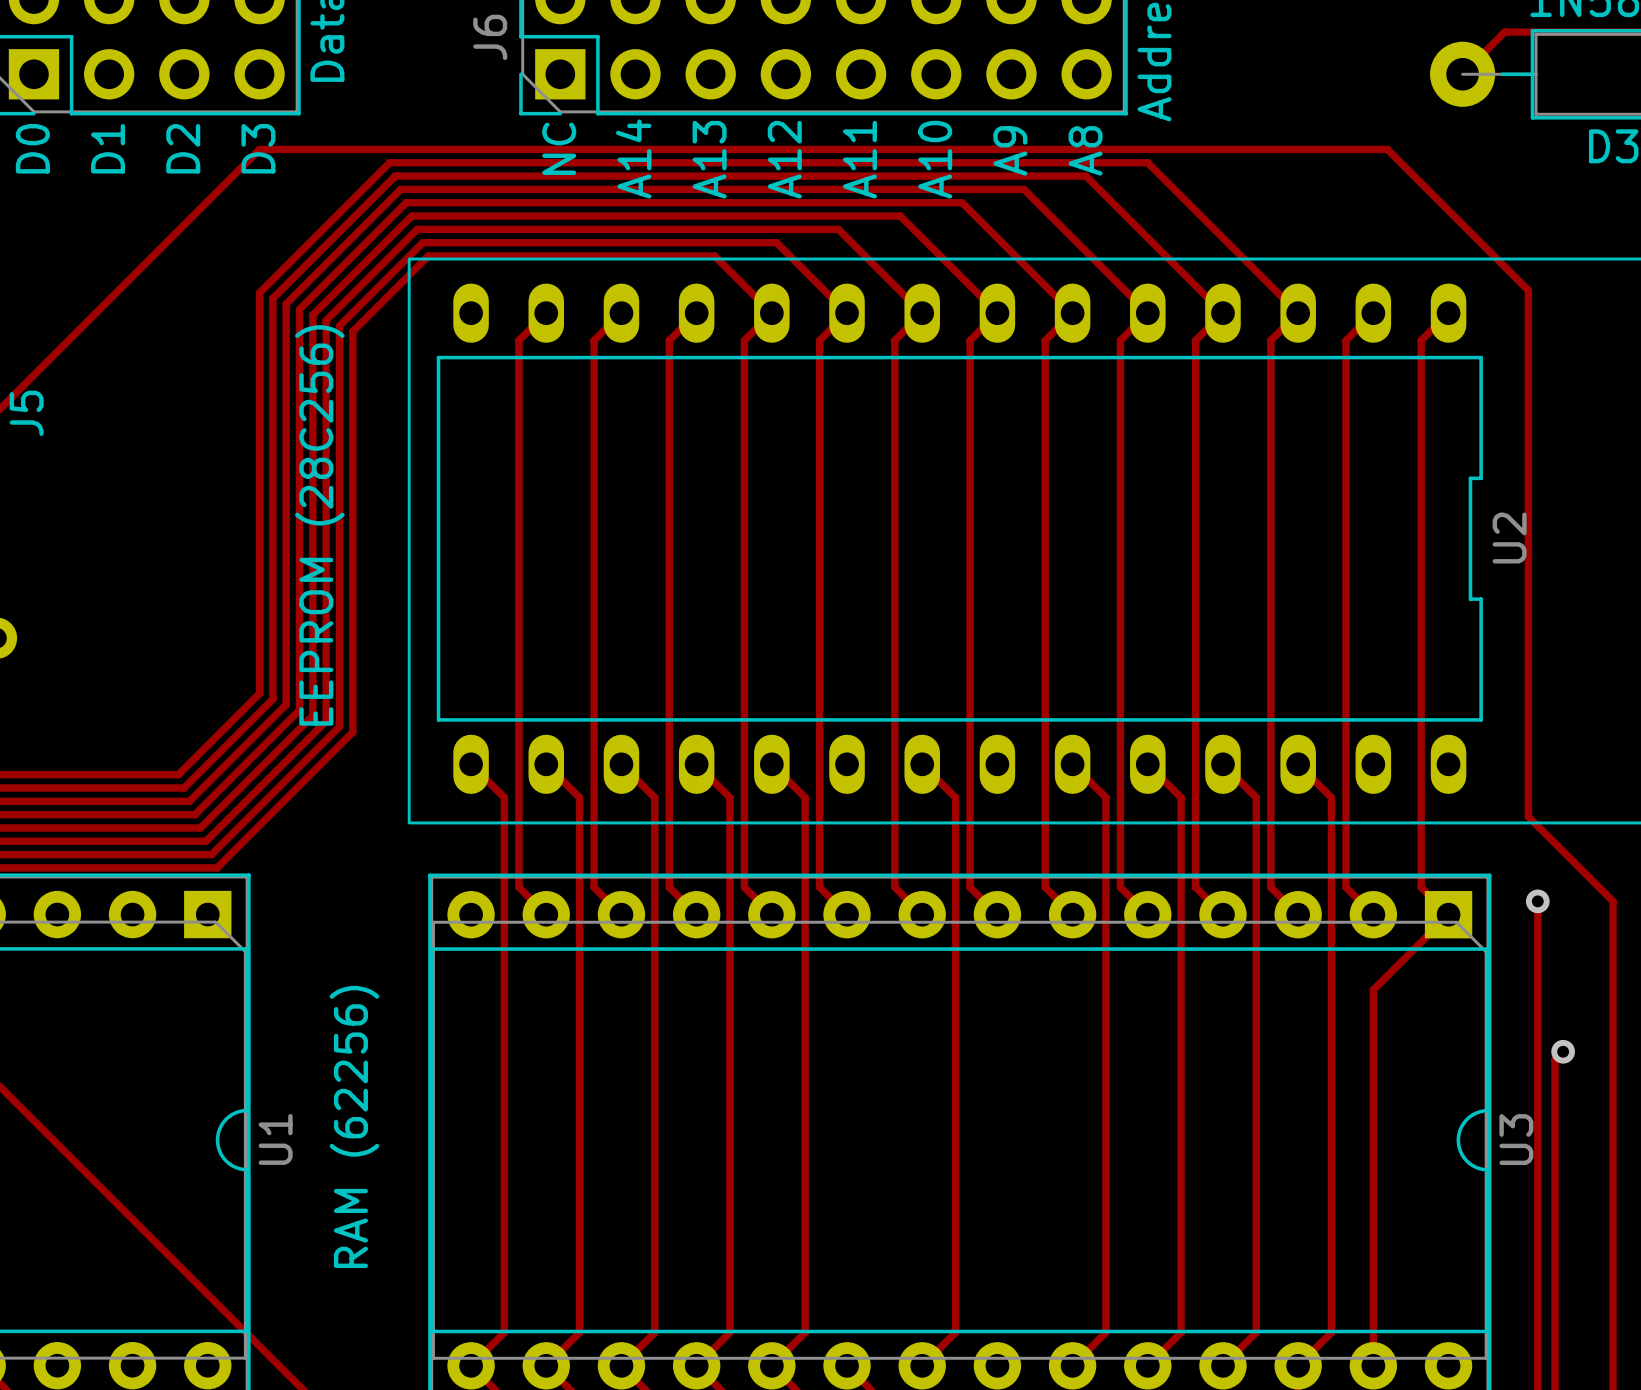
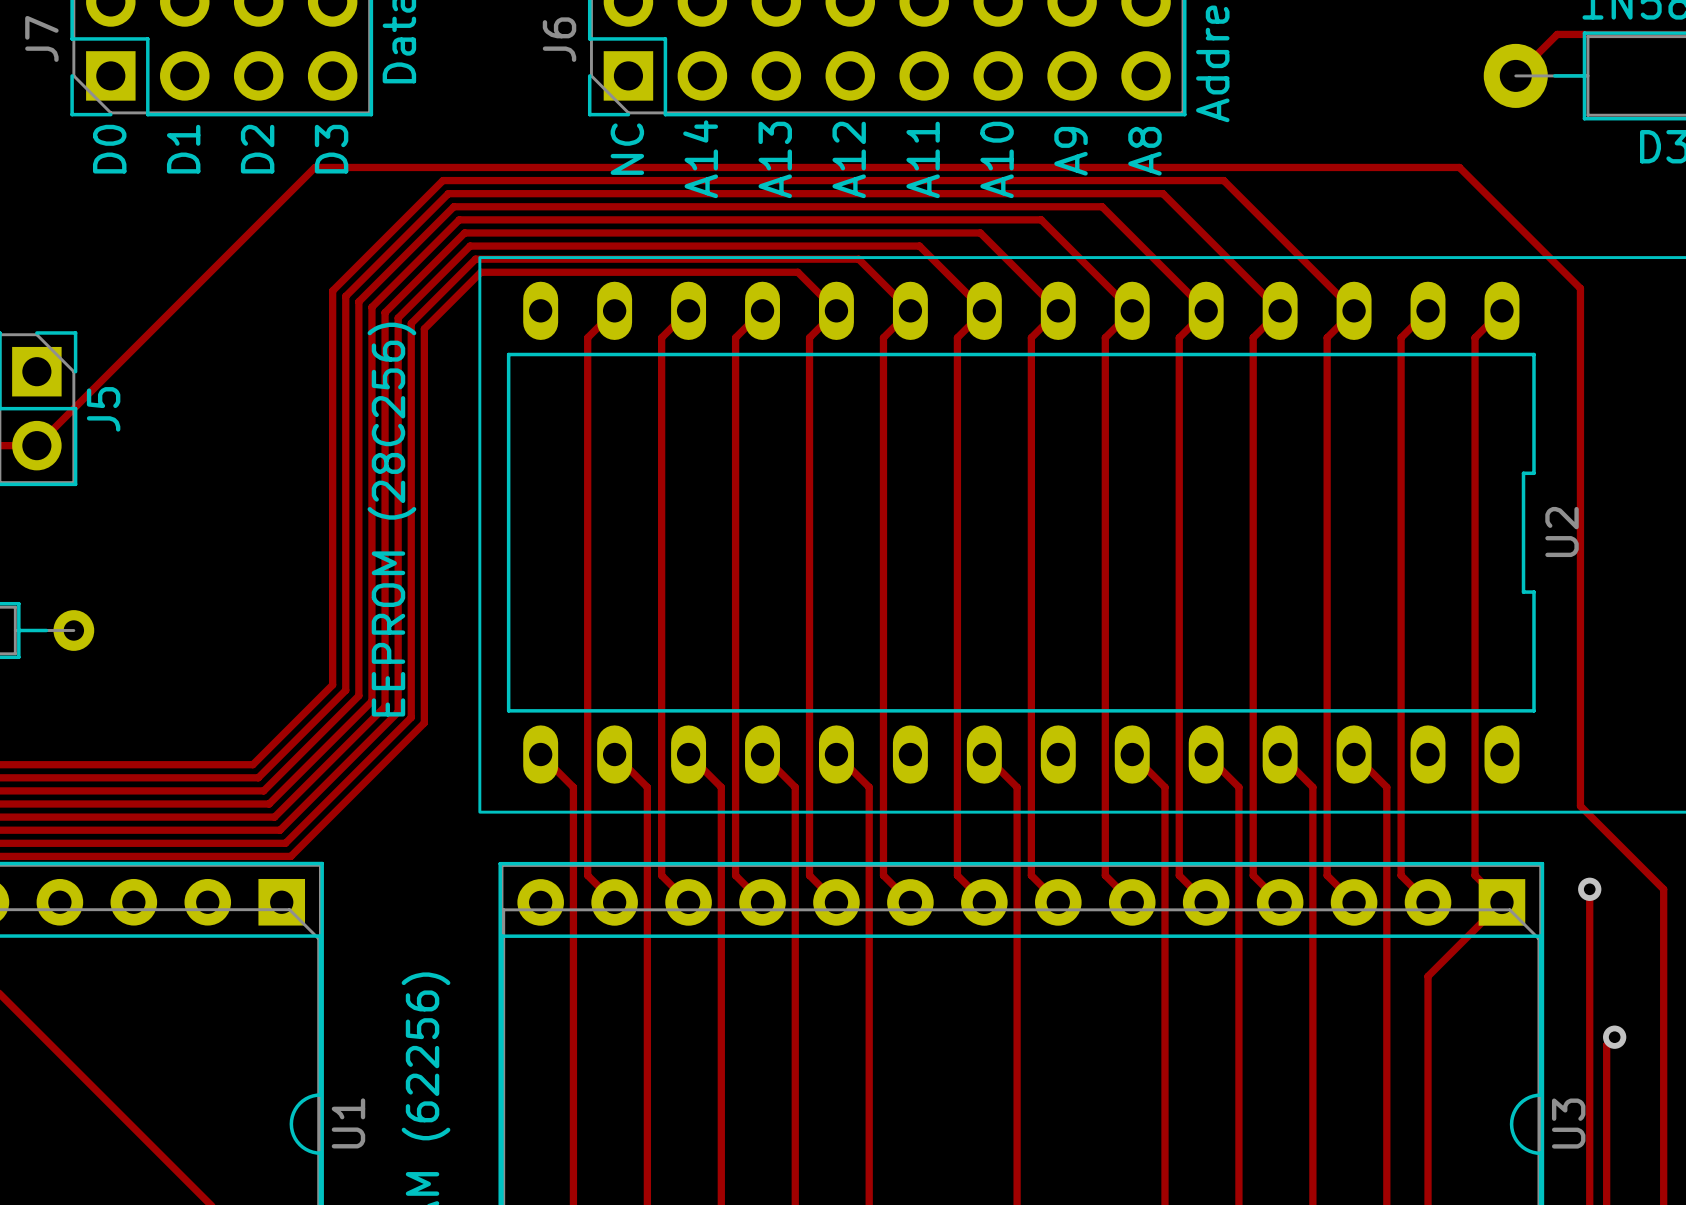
track: (241, 167) (259, 149) (1387, 149) (1405, 167) -> (315, 167) (1459, 167)
track: (371, 180) (389, 162) (1147, 162) (1165, 180) -> (442, 180) (1223, 180)
track: (377, 194) (395, 176) (1085, 176) (1103, 194) -> (448, 193) (1162, 193)
track: (382, 207) (400, 189) (1024, 189) (1041, 207) -> (453, 206) (1102, 206)
track: (388, 220) (406, 202) (962, 202) (980, 220) -> (459, 219) (1041, 219)
track: (393, 233) (411, 216) (900, 216) (918, 233) -> (464, 232) (980, 232)
track: (399, 247) (417, 229) (838, 229) (856, 247) -> (470, 246) (919, 246)
track: (404, 260) (422, 242) (776, 242) (794, 260) -> (475, 259) (858, 259)
track: (410, 273) (428, 256) (714, 256) (732, 273) -> (480, 272) (797, 272)

